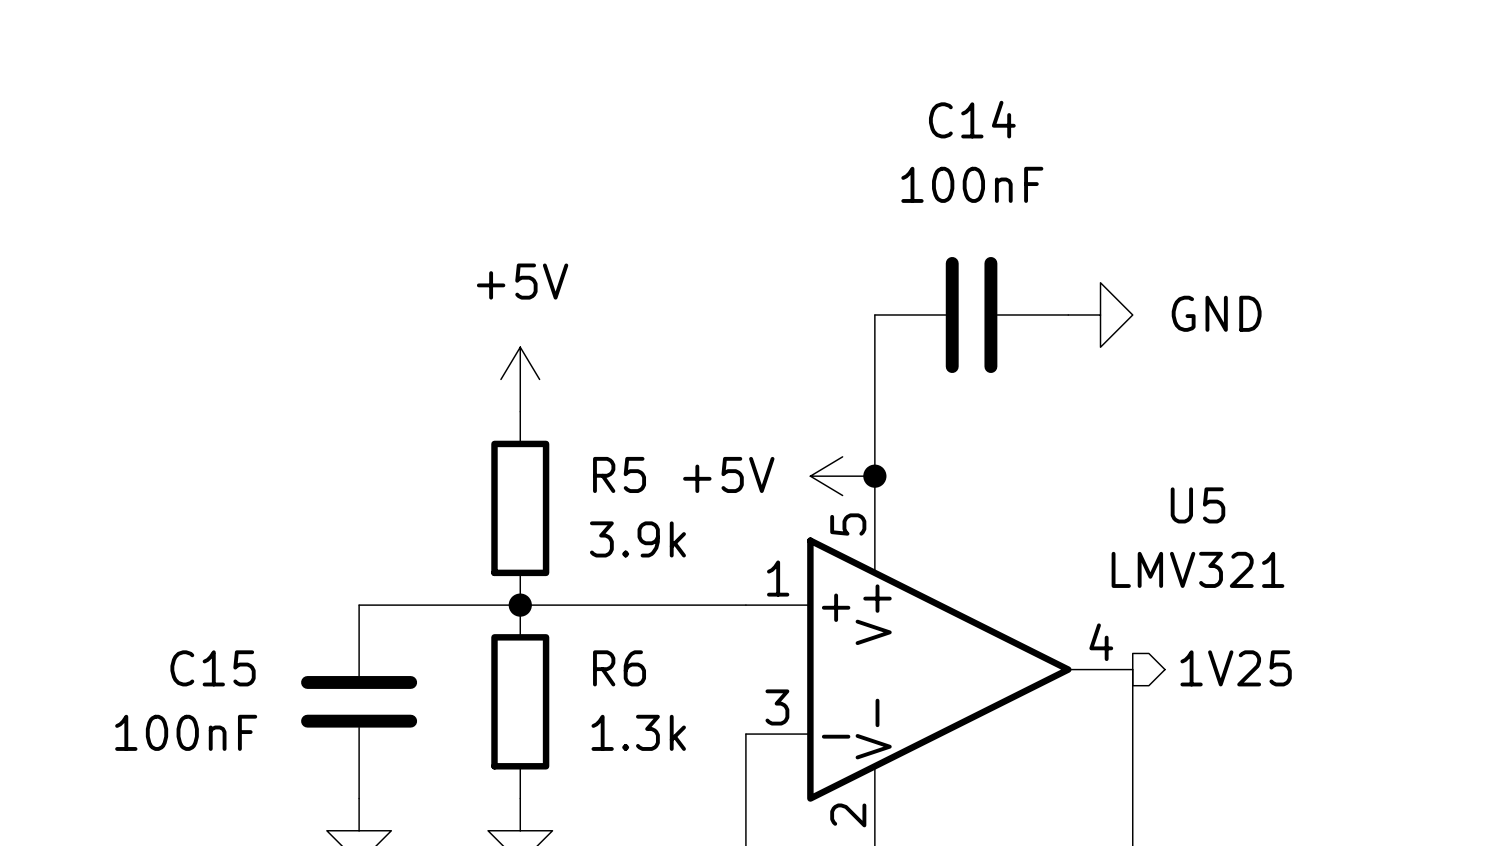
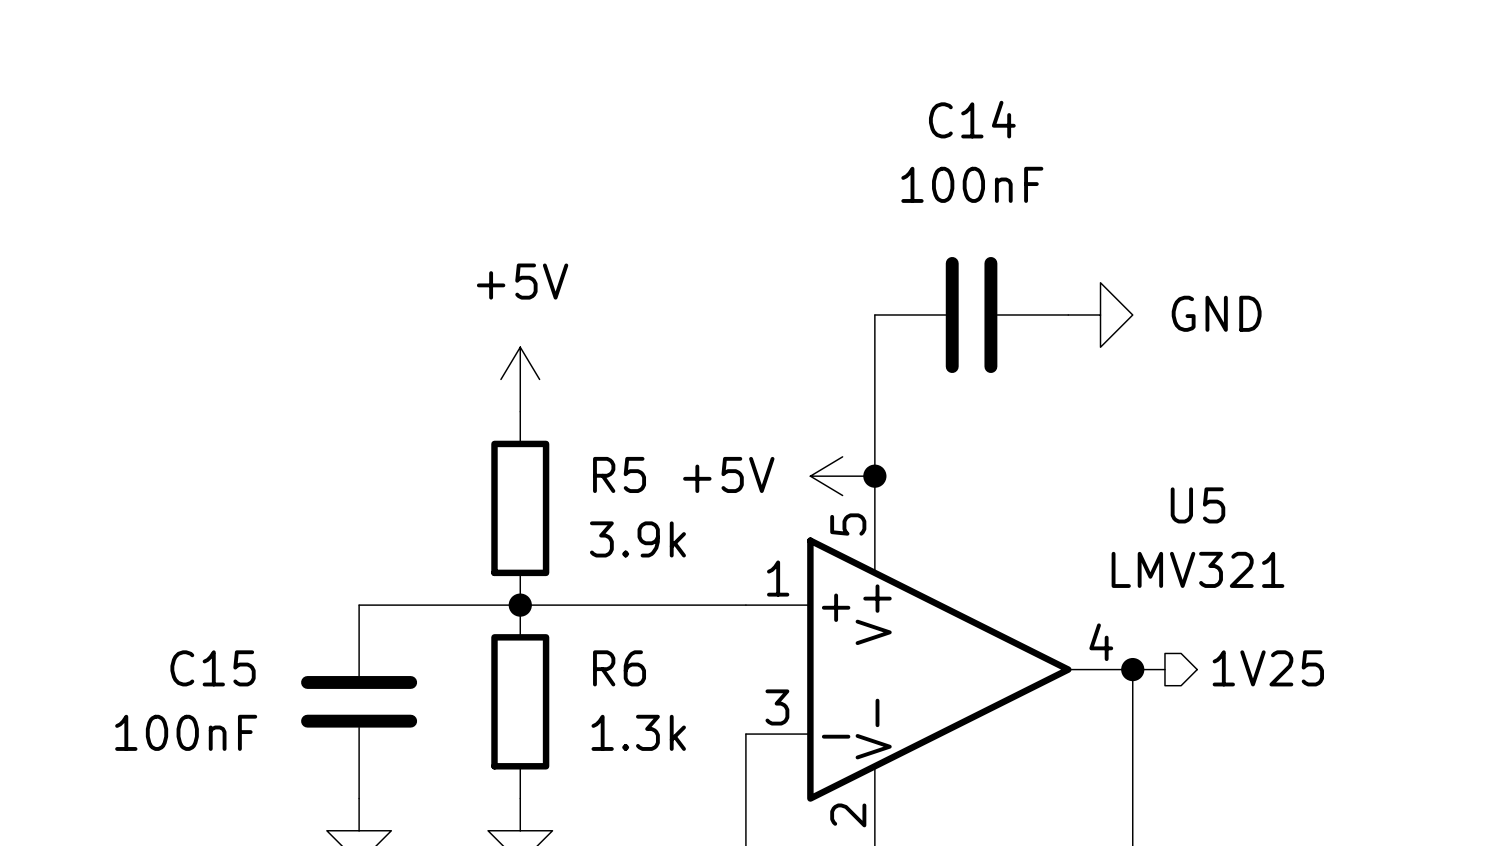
hierarchical label position: 1V25 (1236, 668) -> 1V25 (1268, 668)
wire: none -> (1132, 669) (1164, 669)
junction: none -> (1132, 669)

